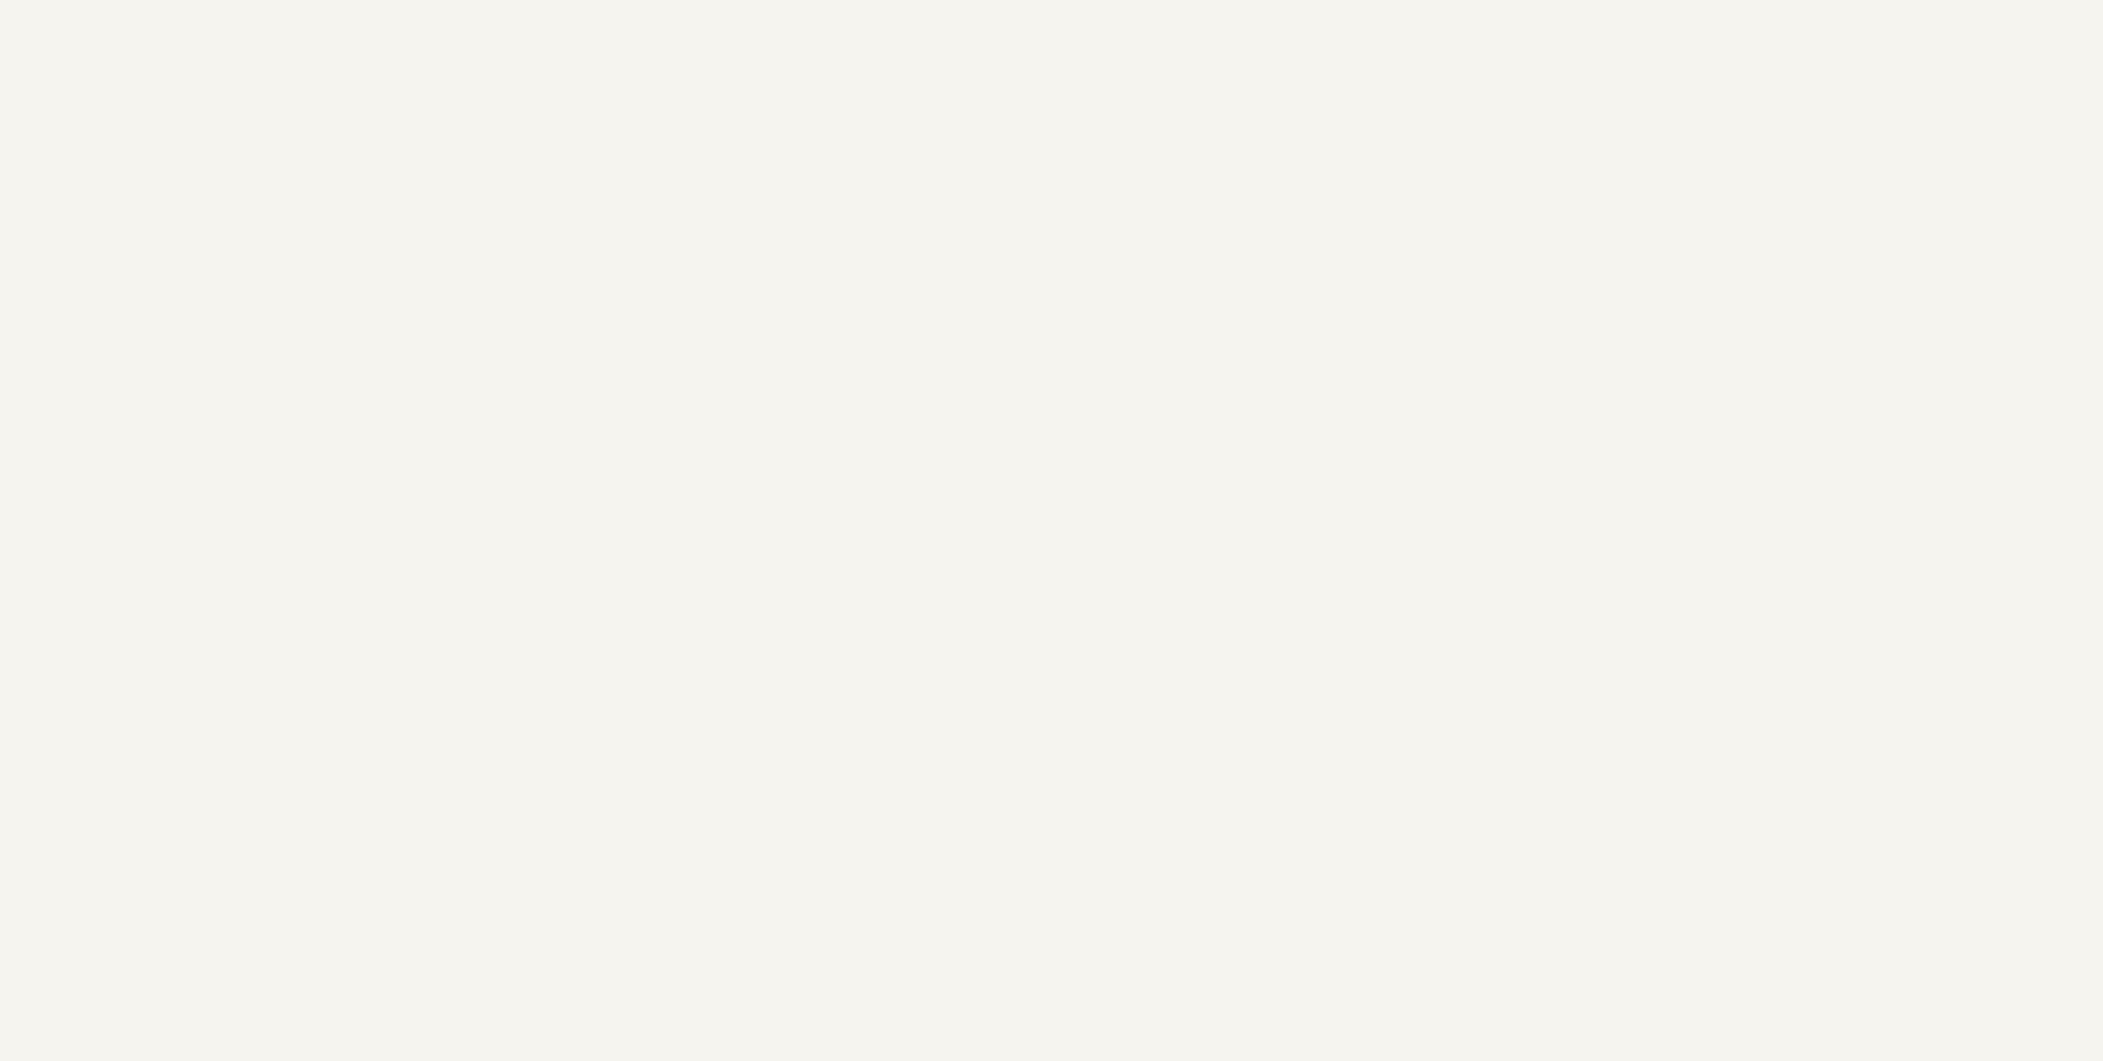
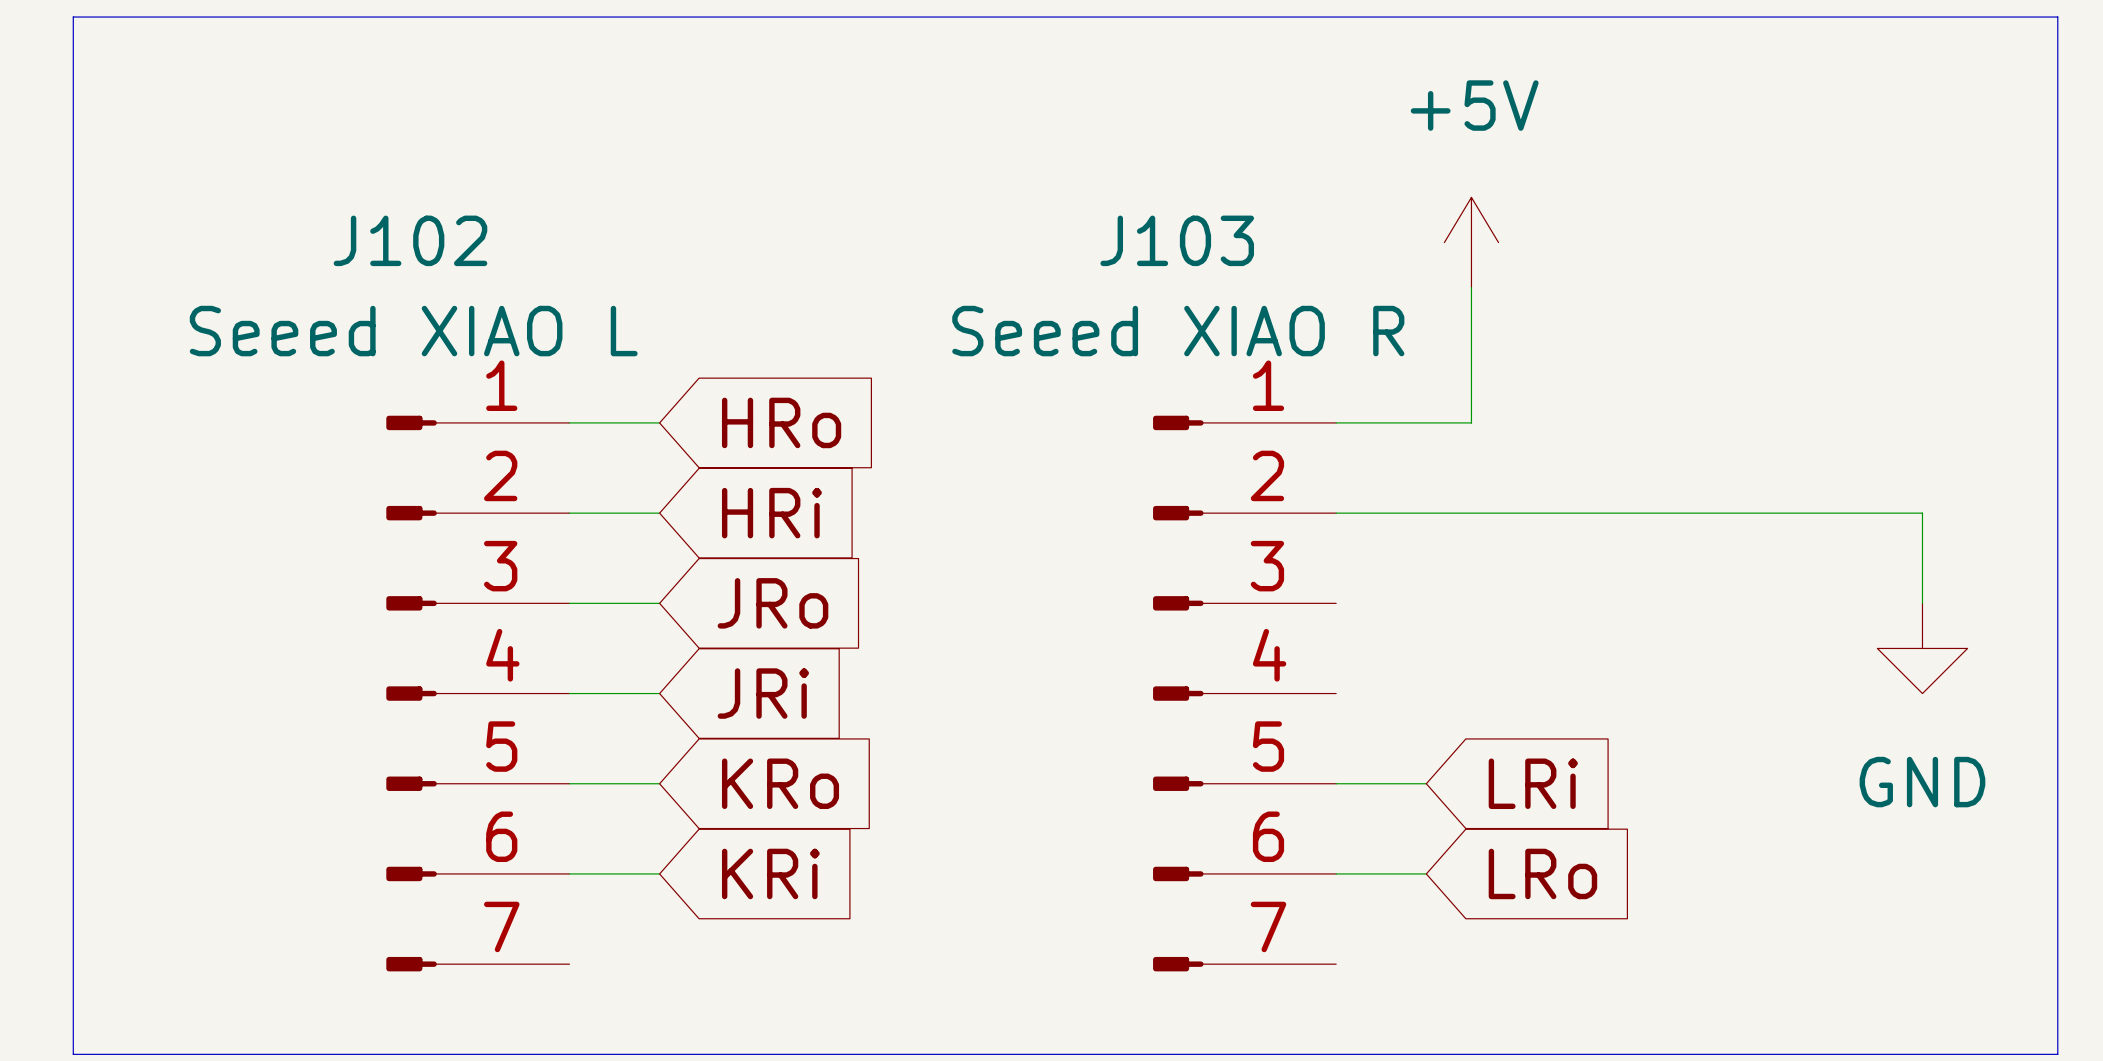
line: none -> (73, 17) (2057, 17) (2057, 1054) (73, 1054) (73, 17)
power symbol: none -> +5V (1471, 242)
wire: none -> (1471, 287) (1471, 422) (1336, 422)
wire: none -> (569, 422) (659, 422)
global label: none -> HRo (781, 422)
wire: none -> (569, 513) (659, 513)
global label: none -> HRi (771, 513)
wire: none -> (1336, 513) (1922, 513) (1922, 603)
wire: none -> (569, 603) (659, 603)
global label: none -> JRo (772, 603)
power symbol: none -> GND (1922, 648)
J102: none -> Seeed XIAO L (477, 693)
wire: none -> (569, 693) (659, 693)
global label: none -> JRi (763, 693)
J103: none -> Seeed XIAO R (1244, 693)
wire: none -> (569, 783) (659, 783)
global label: none -> KRo (780, 783)
wire: none -> (1336, 783) (1426, 783)
global label: none -> LRi (1533, 783)
wire: none -> (569, 873) (659, 873)
global label: none -> KRi (770, 873)
wire: none -> (1336, 873) (1426, 873)
global label: none -> LRo (1542, 873)

